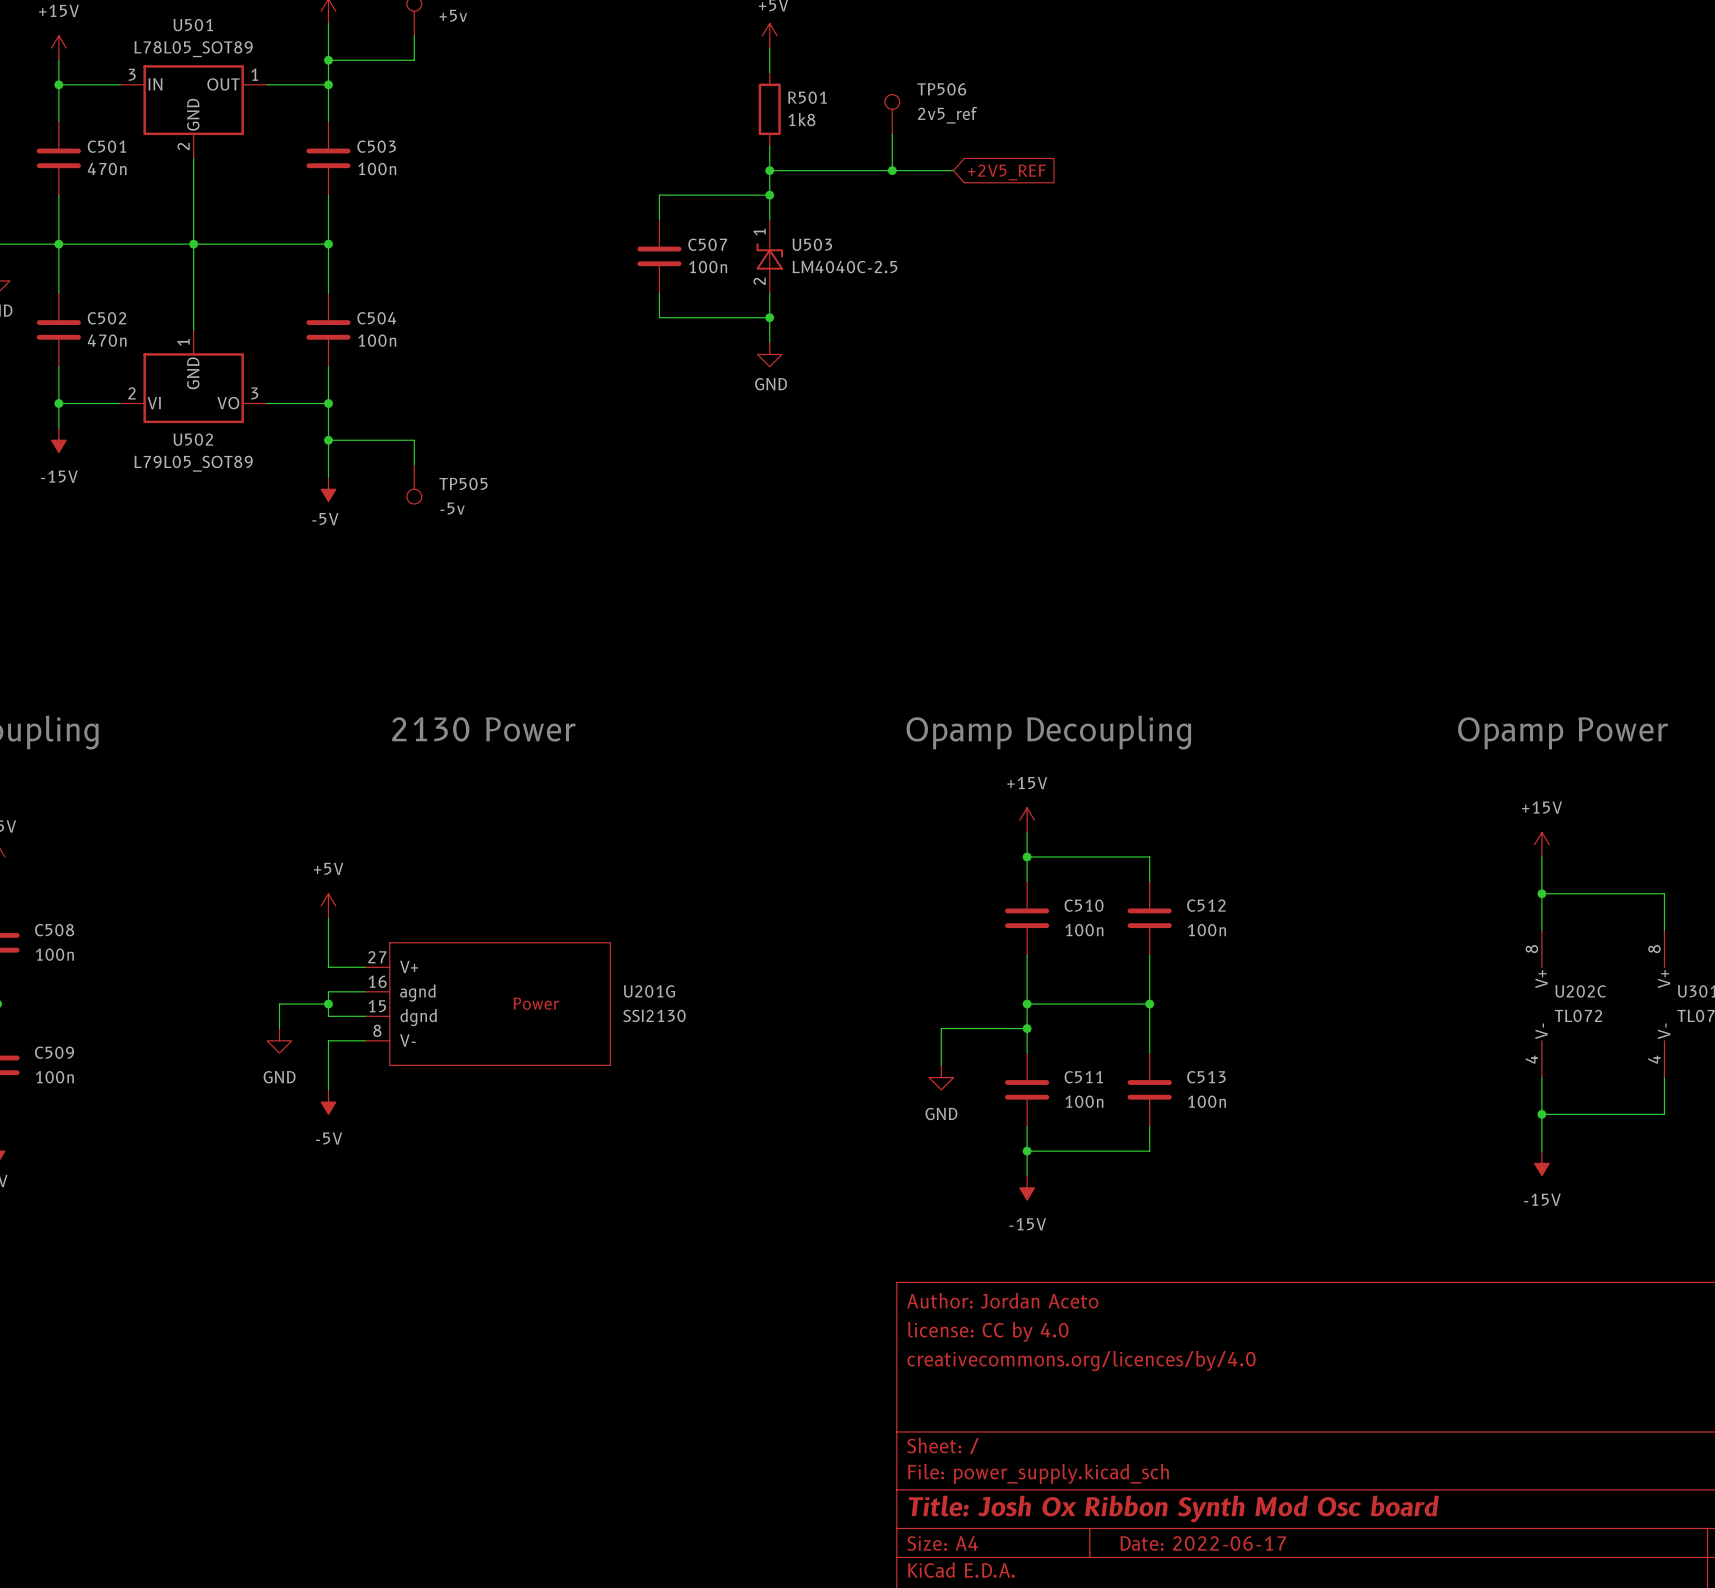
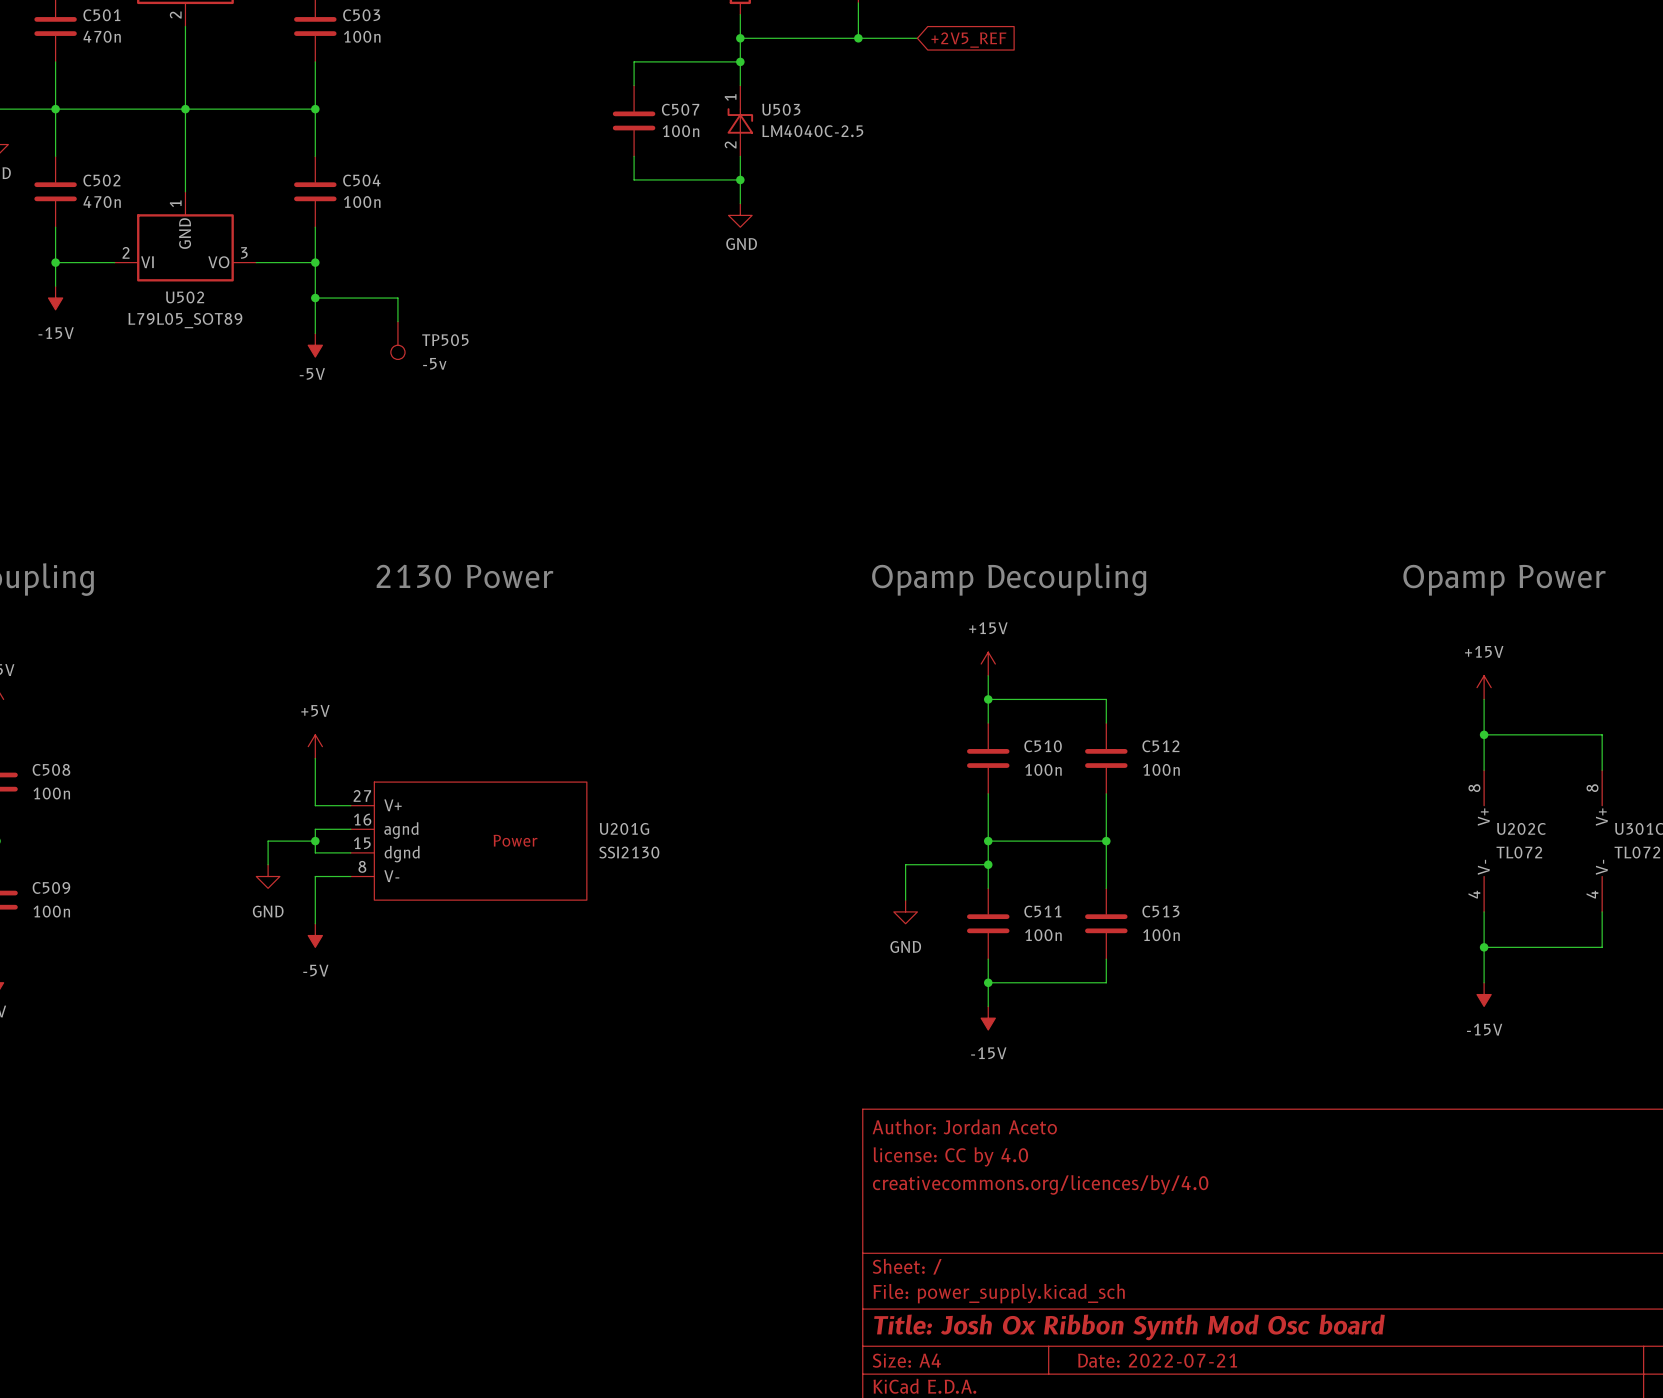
title block: Date: 2022-06-17 (1203, 1543) -> Date: 2022-07-21 (1157, 1360)

